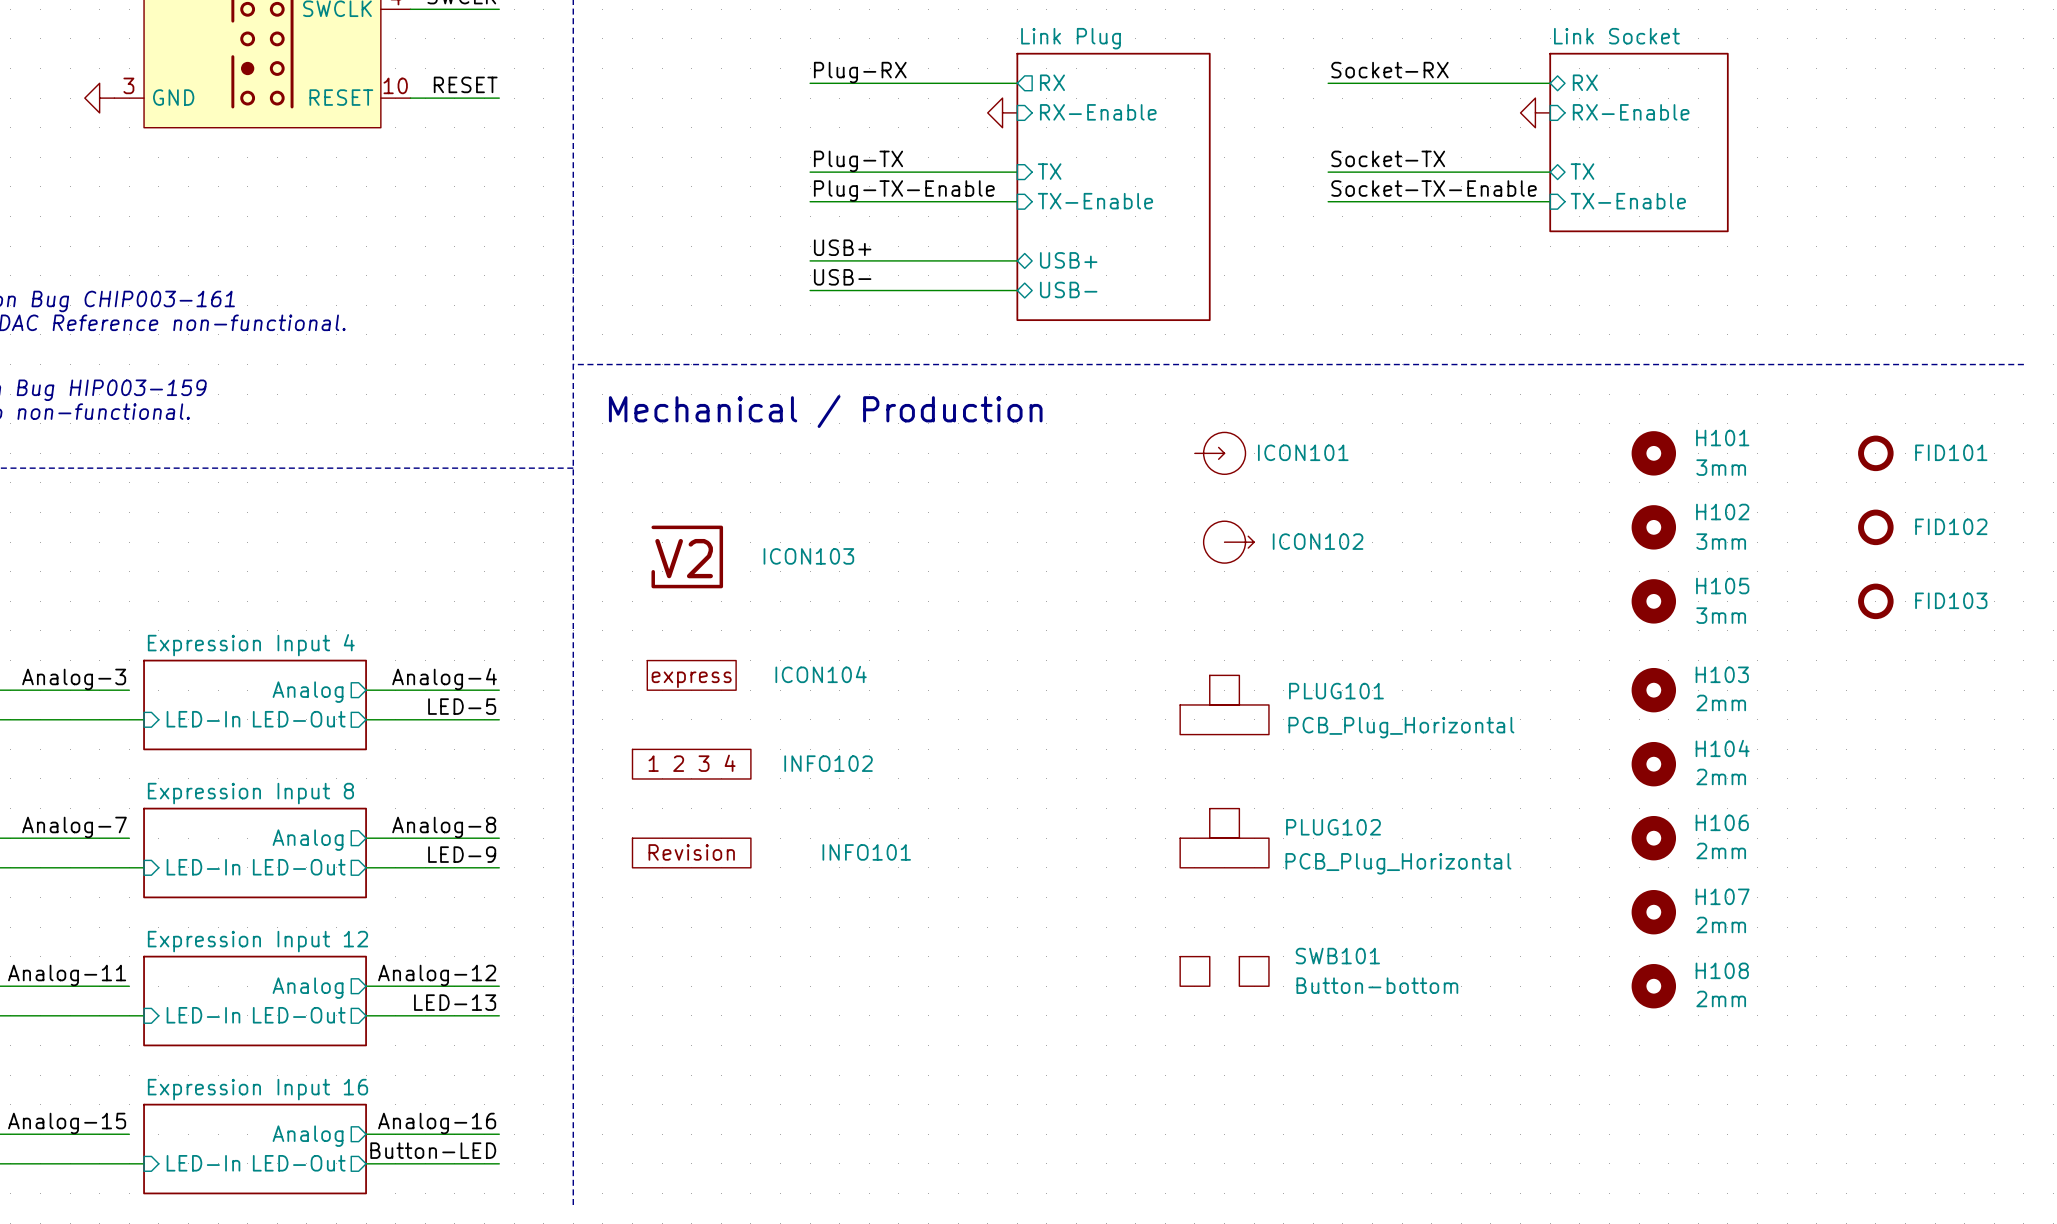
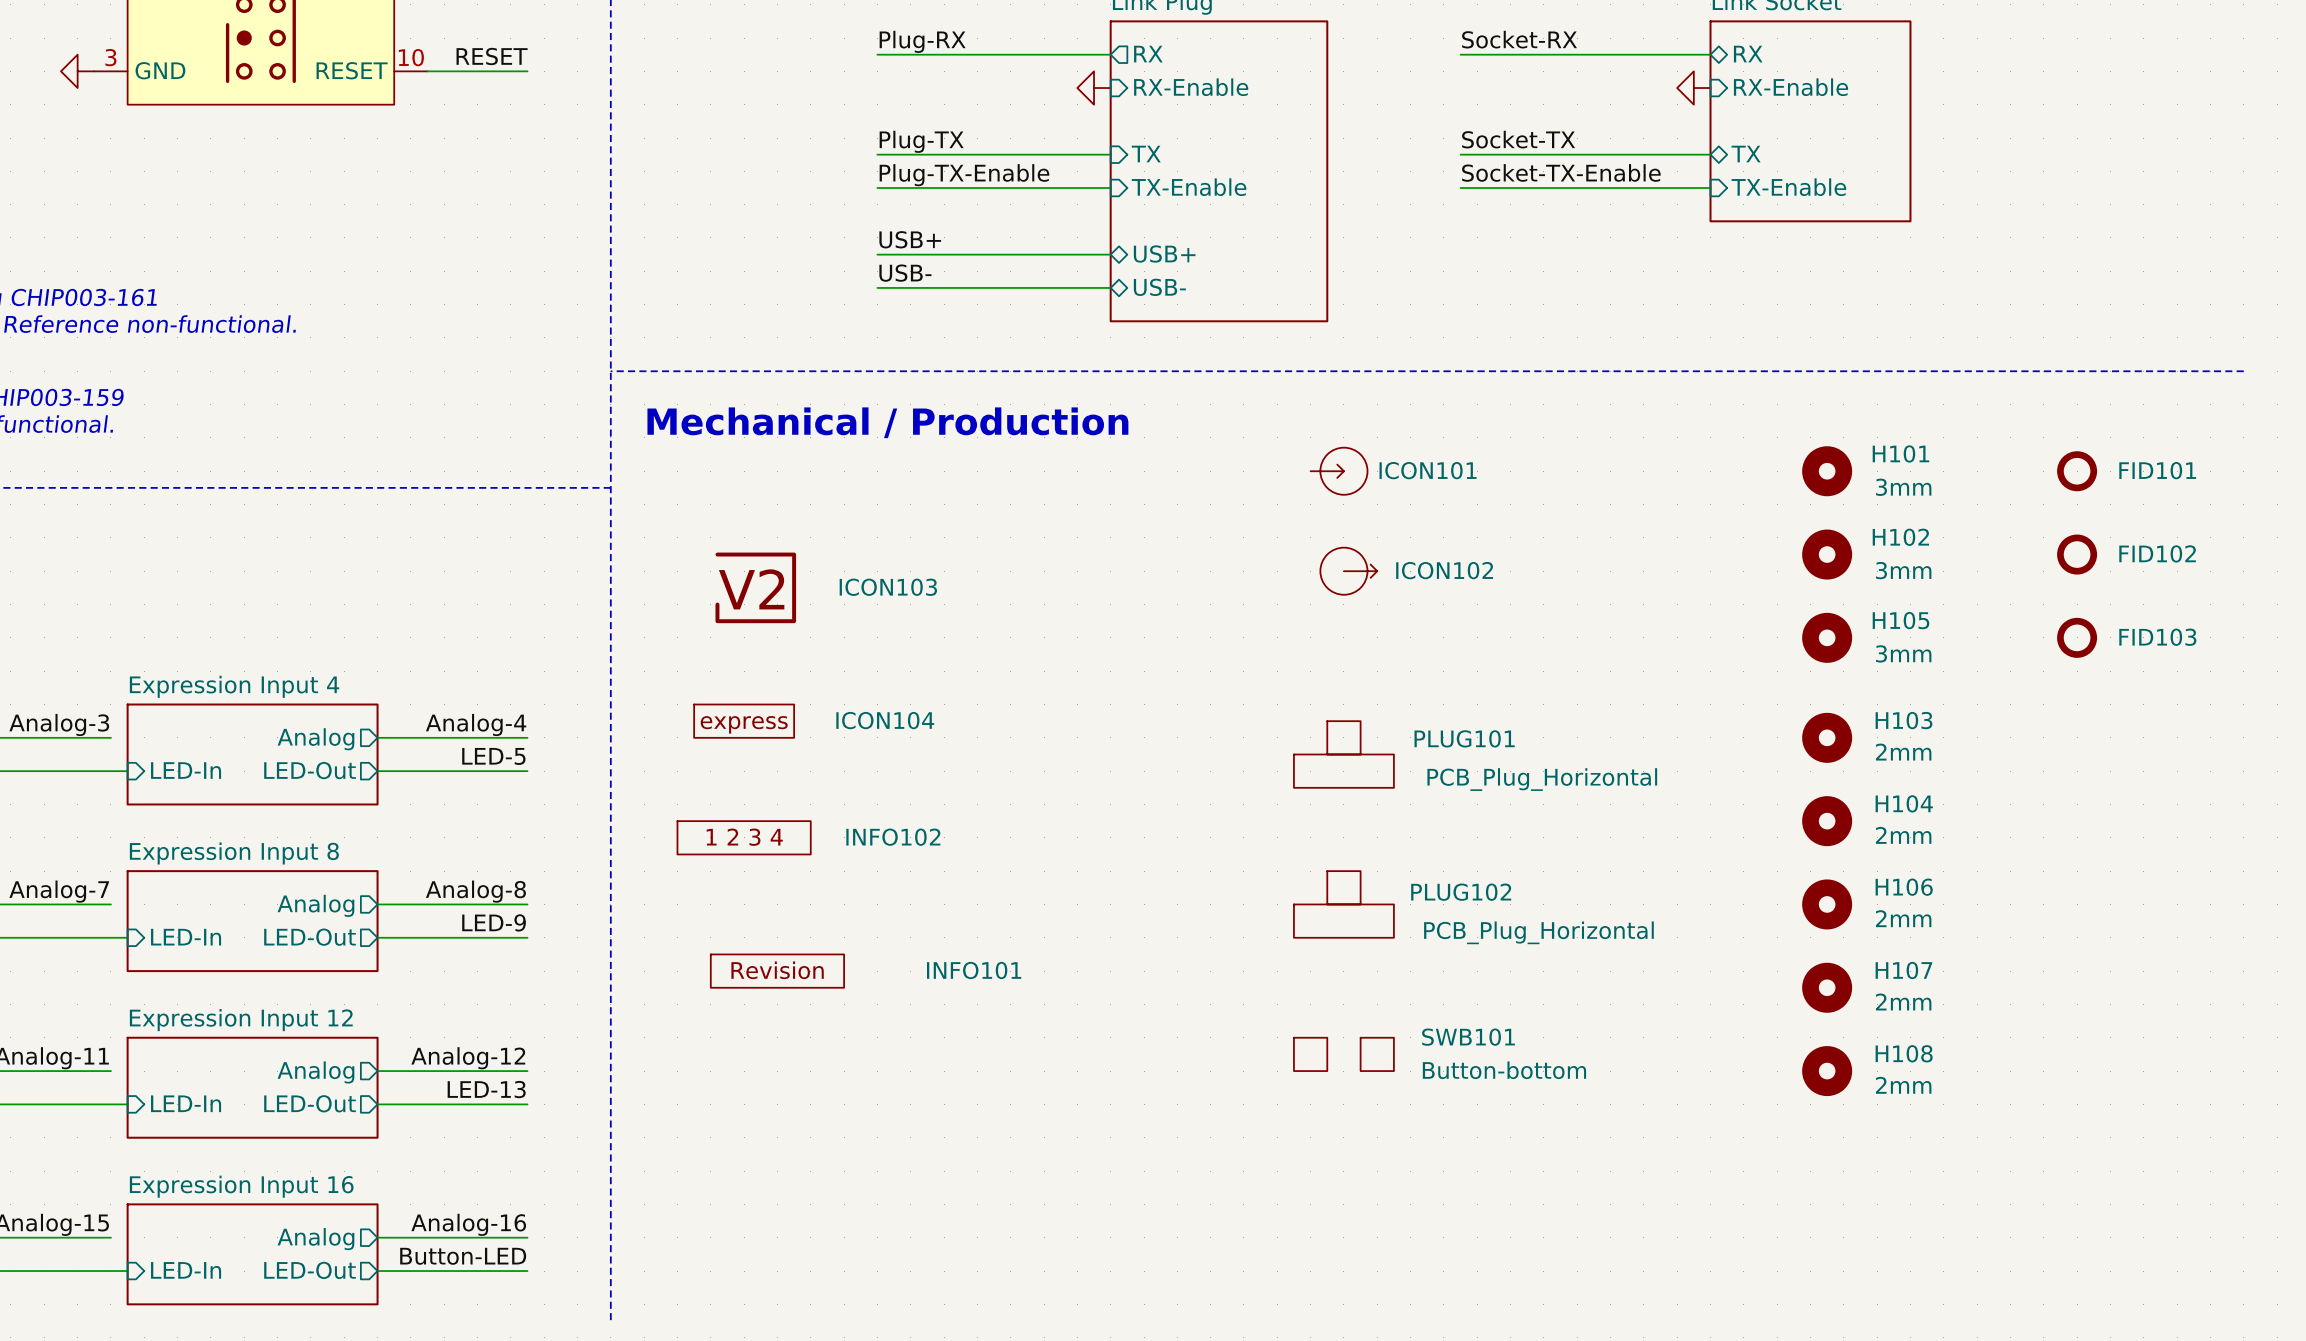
ICON103 position: (687, 556) -> (755, 587)
INFO102 position: (691, 764) -> (744, 837)
INFO101 position: (691, 853) -> (777, 971)

